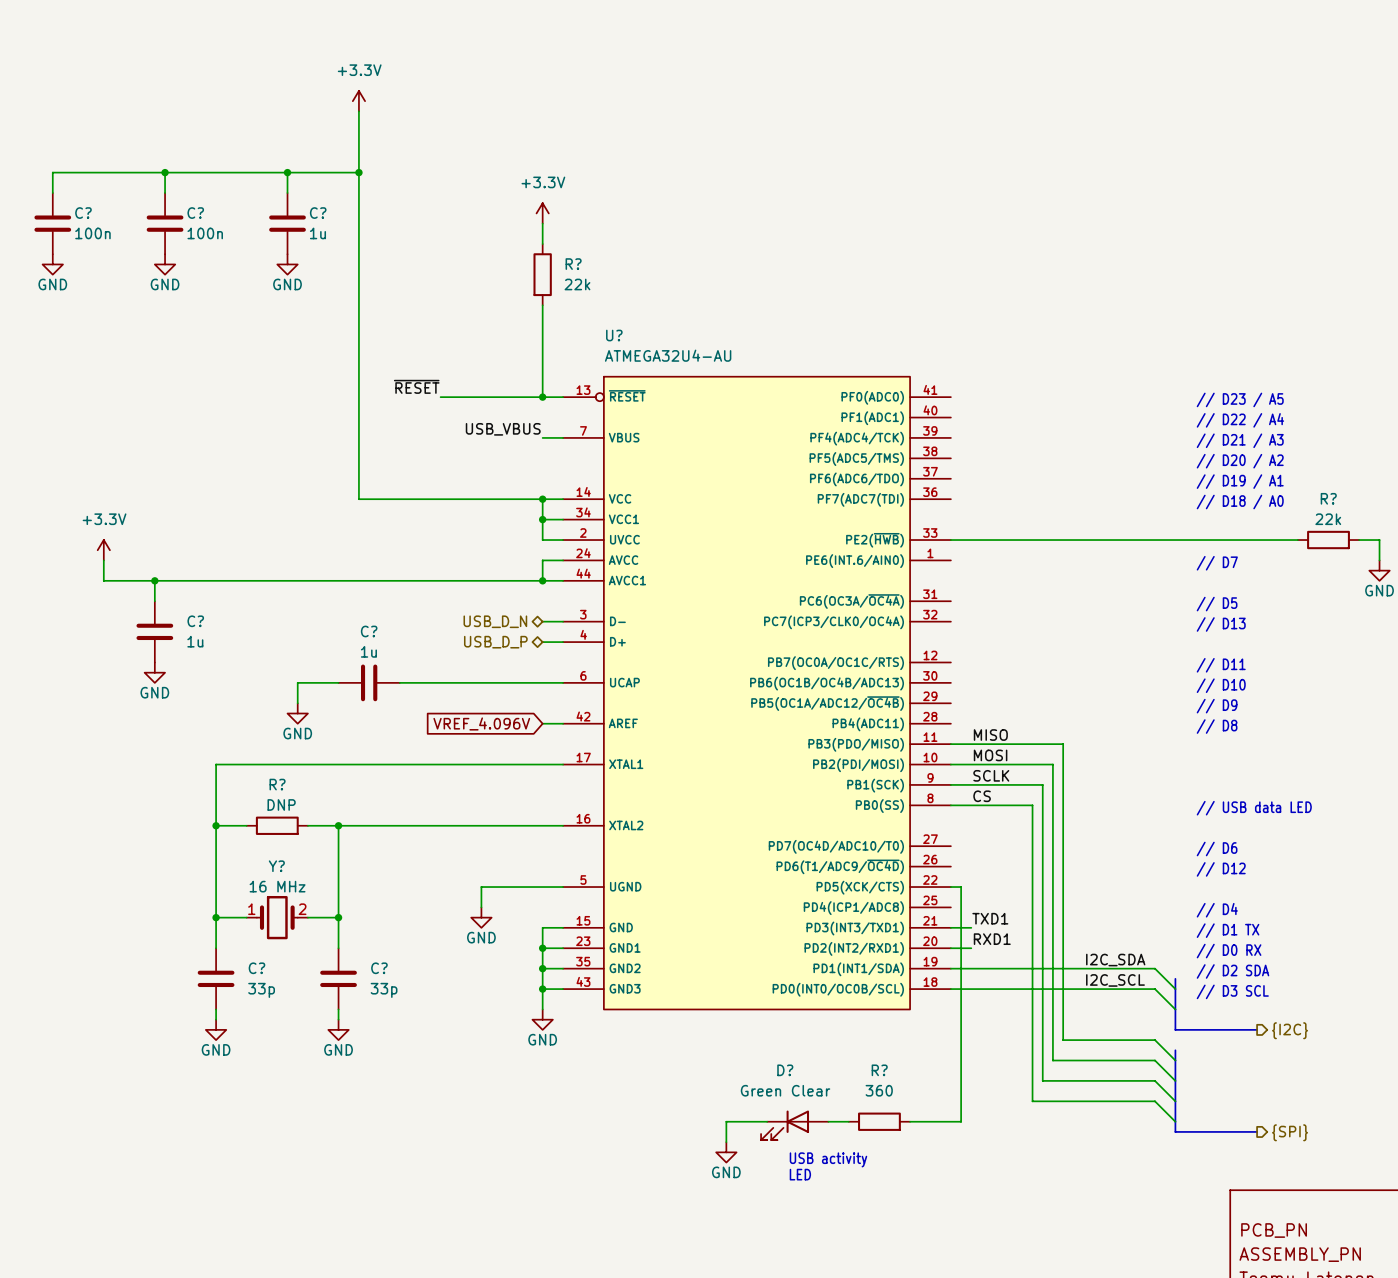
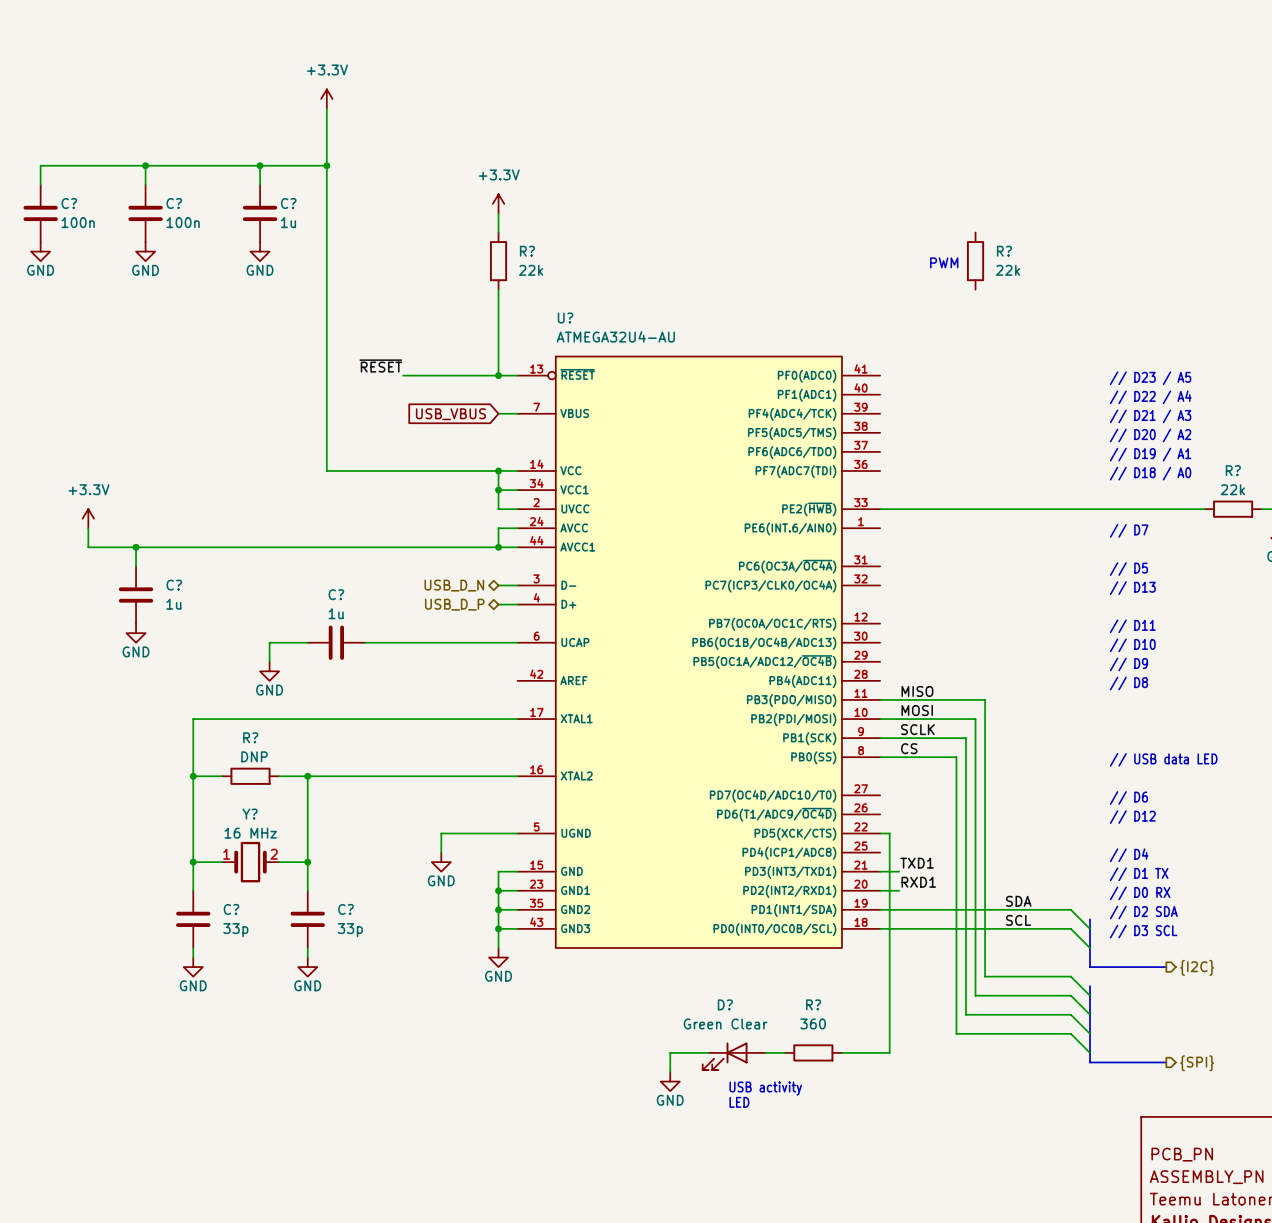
R?: none -> (975, 261)
text: none -> PWM (944, 262)
label: USB_VBUS (503, 429) -> none
global label: none -> USB_VBUS (450, 414)
global label: VREF_4.096V (481, 723) -> none
wire: (542, 723) (563, 723) -> none
label: I2C_SDA (1115, 960) -> SDA (1018, 901)
label: I2C_SCL (1115, 980) -> SCL (1018, 920)

